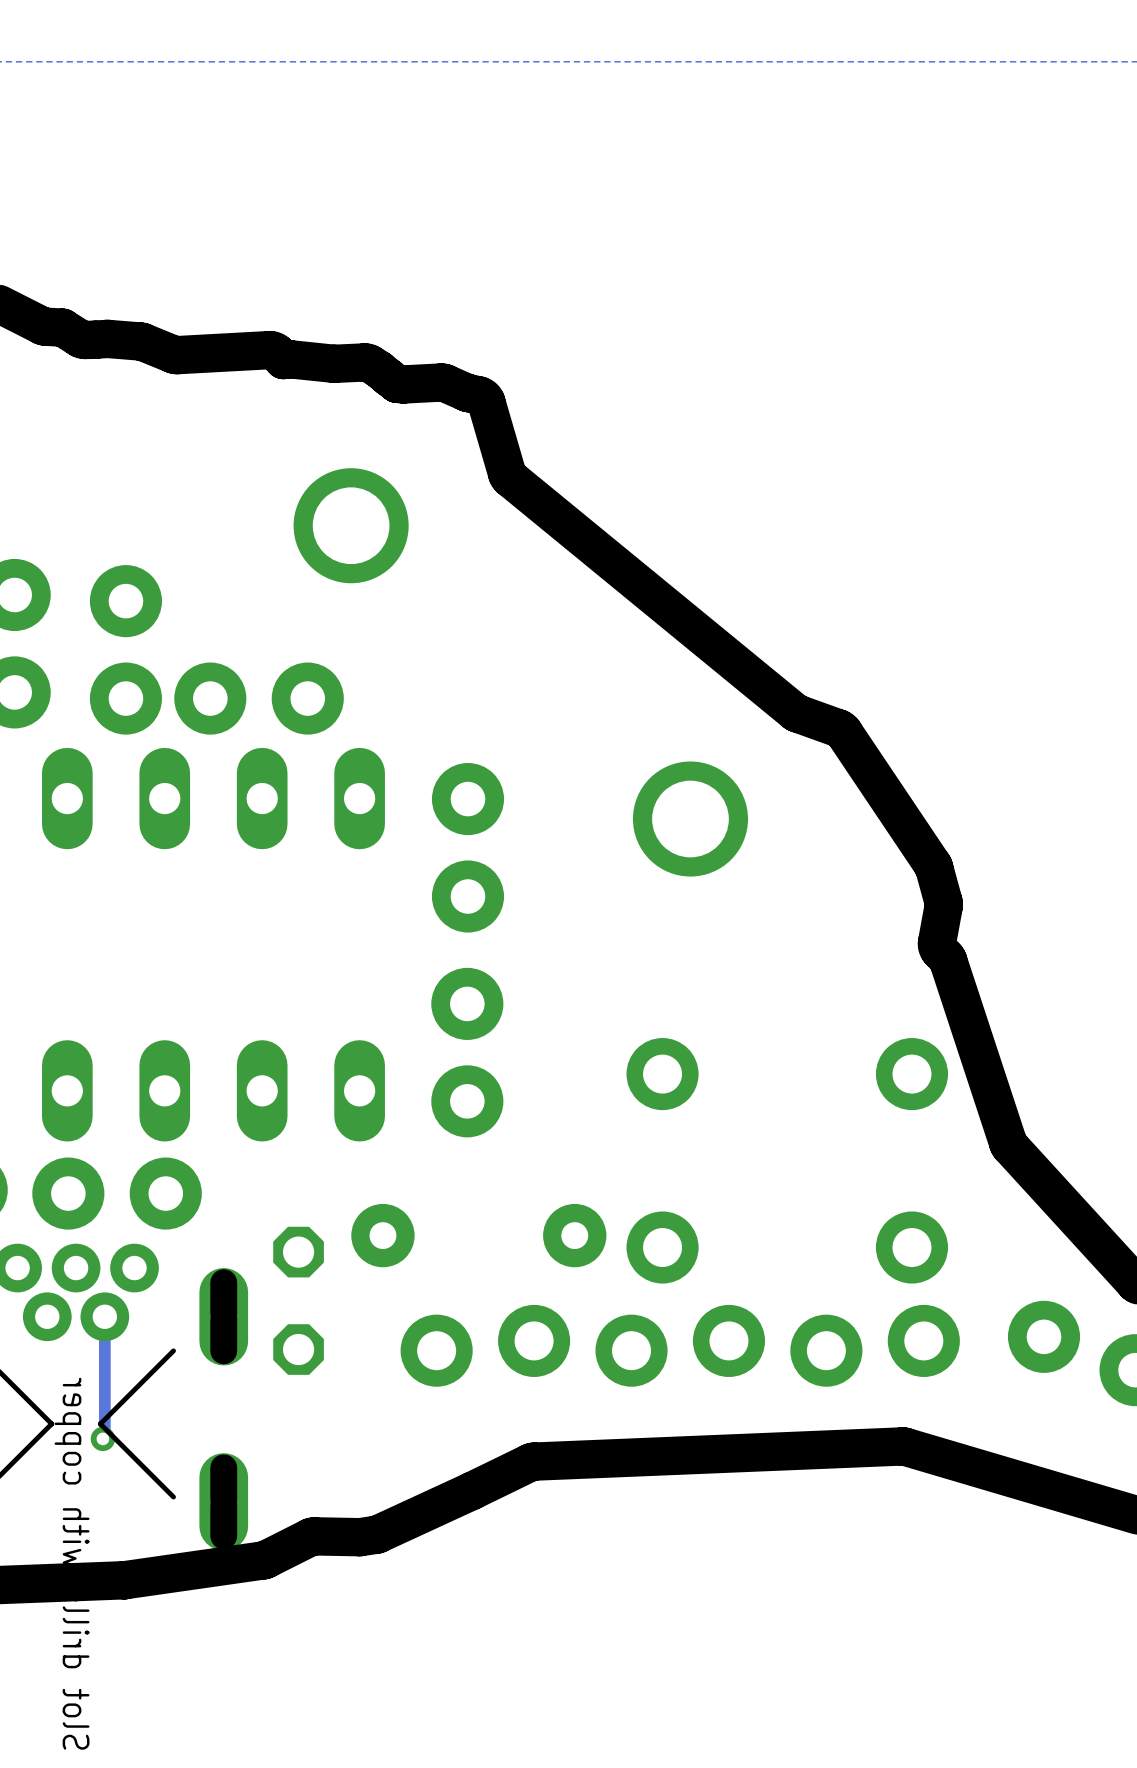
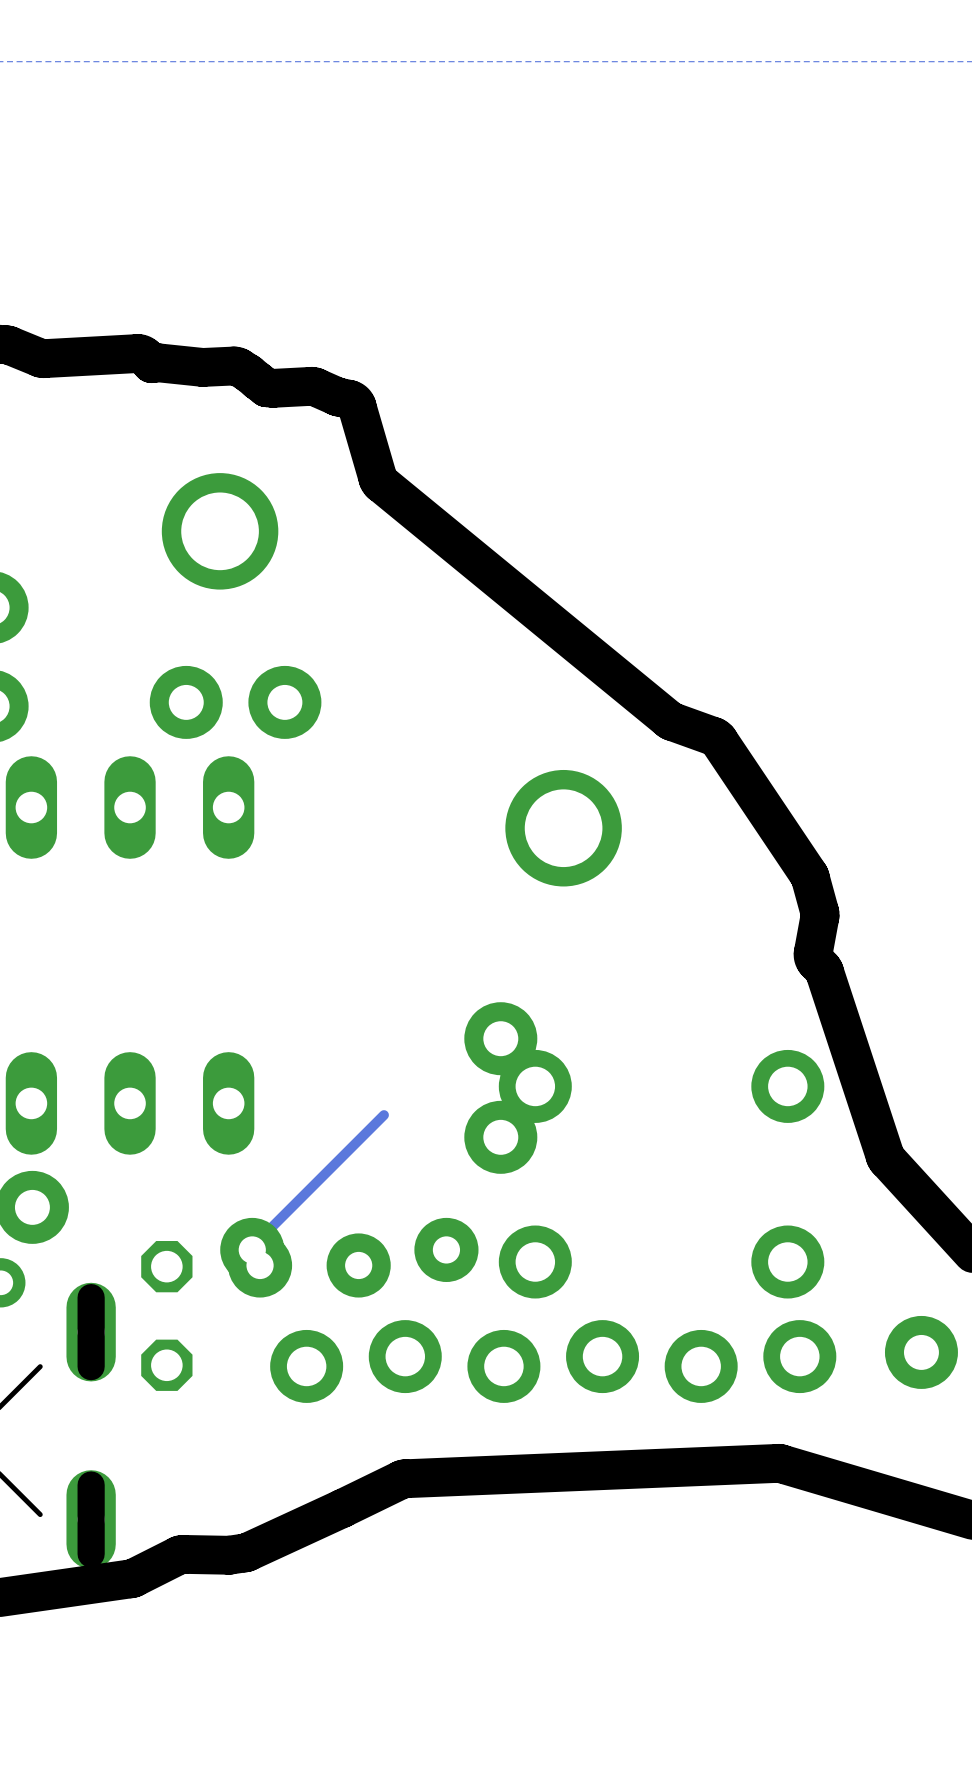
part: none -> (235, 702)
part: (259, 698) -> none
part: (467, 847) -> none
part: (467, 1052) -> none
part: none -> (500, 1088)
track: none -> (383, 1115) (260, 1239) (260, 1265)
part: none -> (309, 1265)

